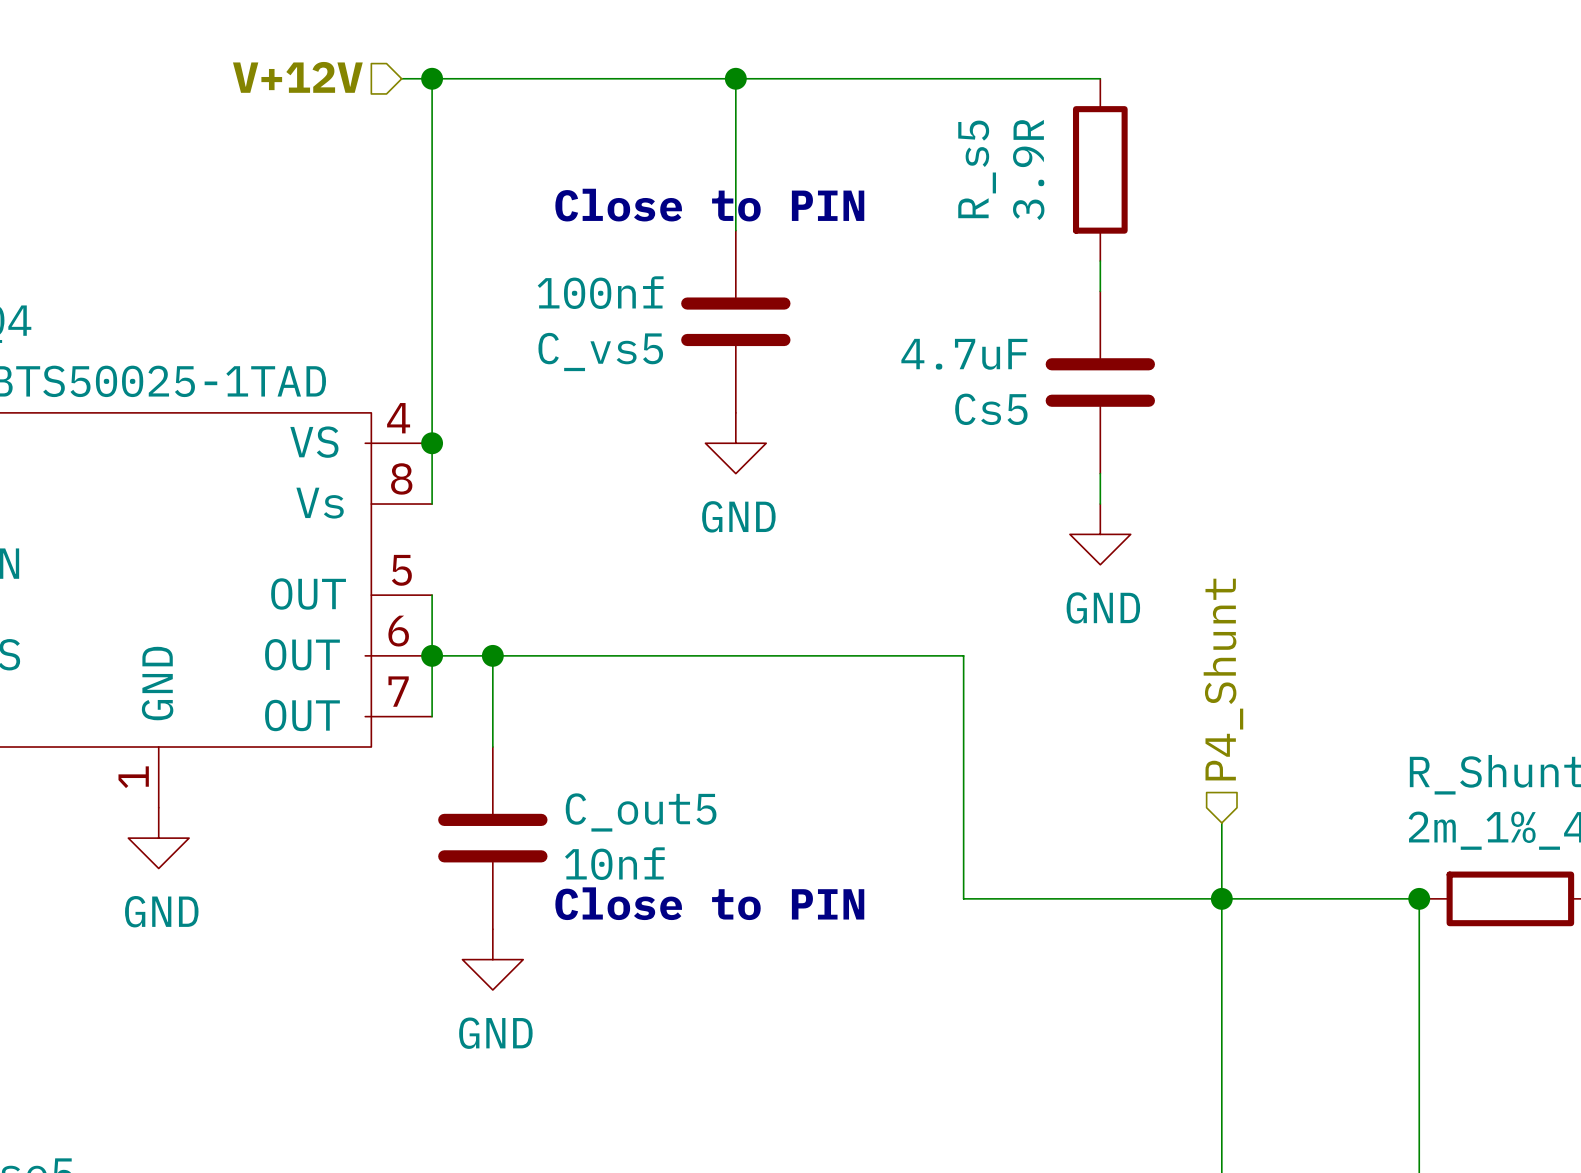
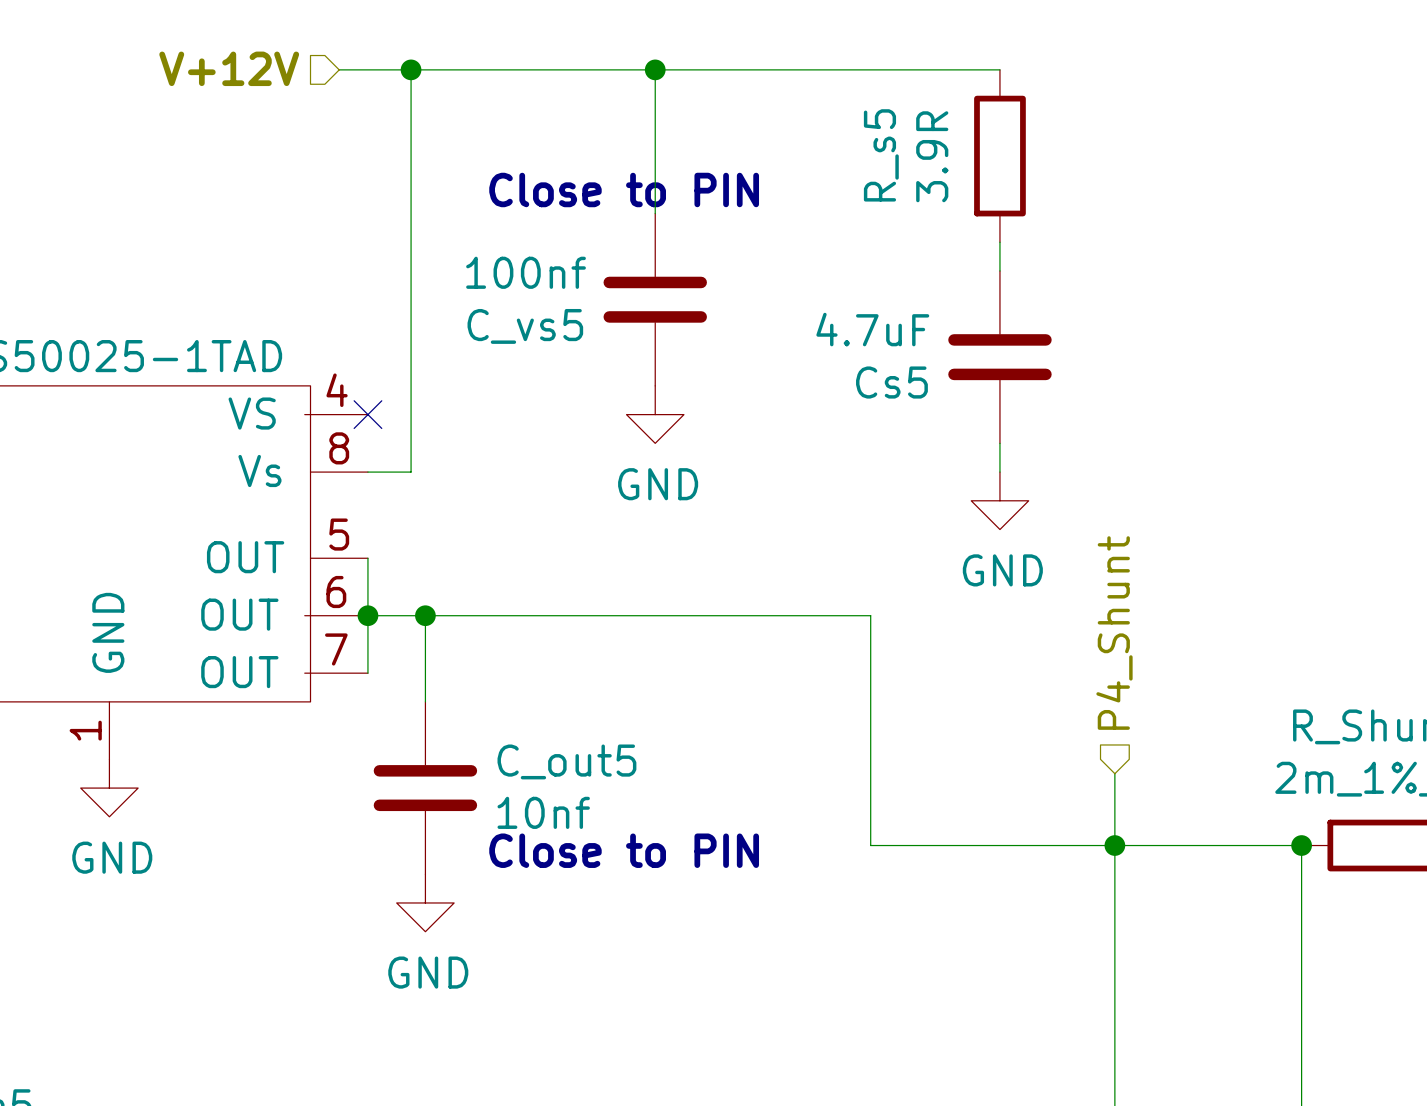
wire: (432, 78) (432, 504) -> (411, 69) (411, 472) (367, 472)
junction position: (432, 78) -> (411, 69)
junction: (432, 443) -> none
no-connect mark: none -> (367, 414)

